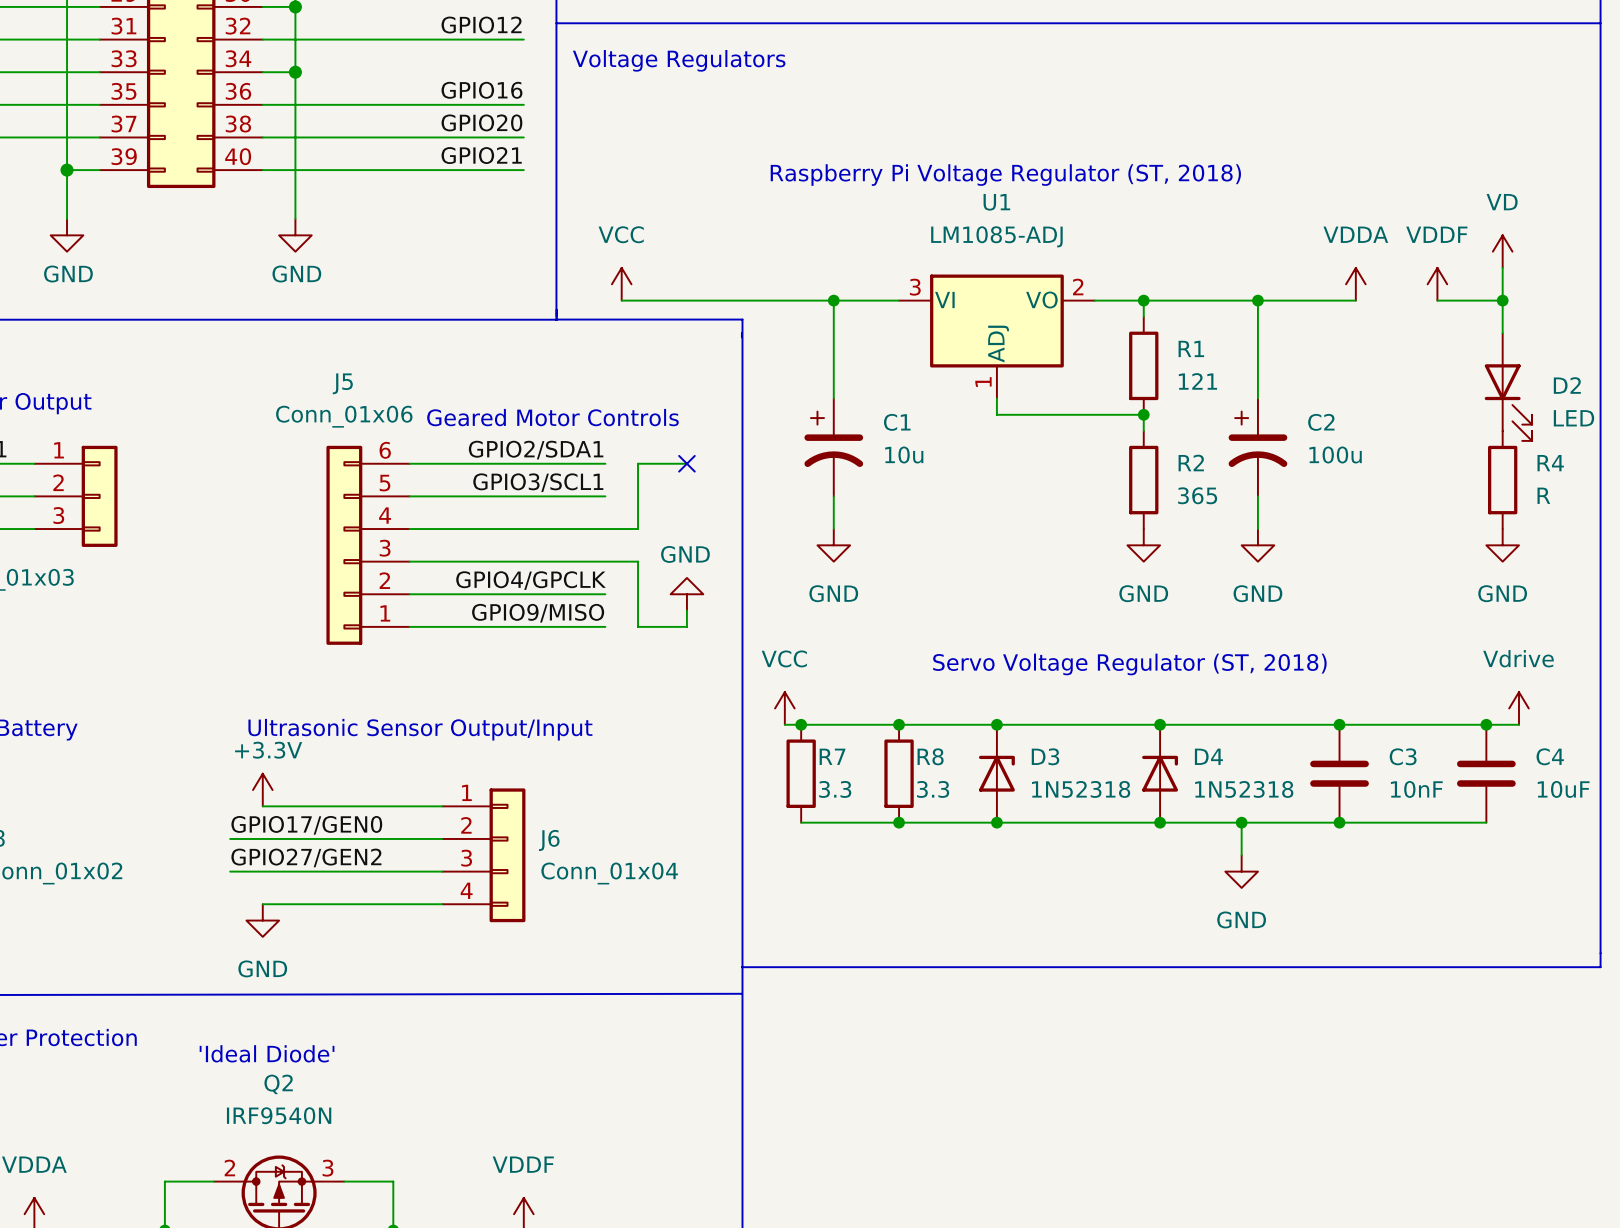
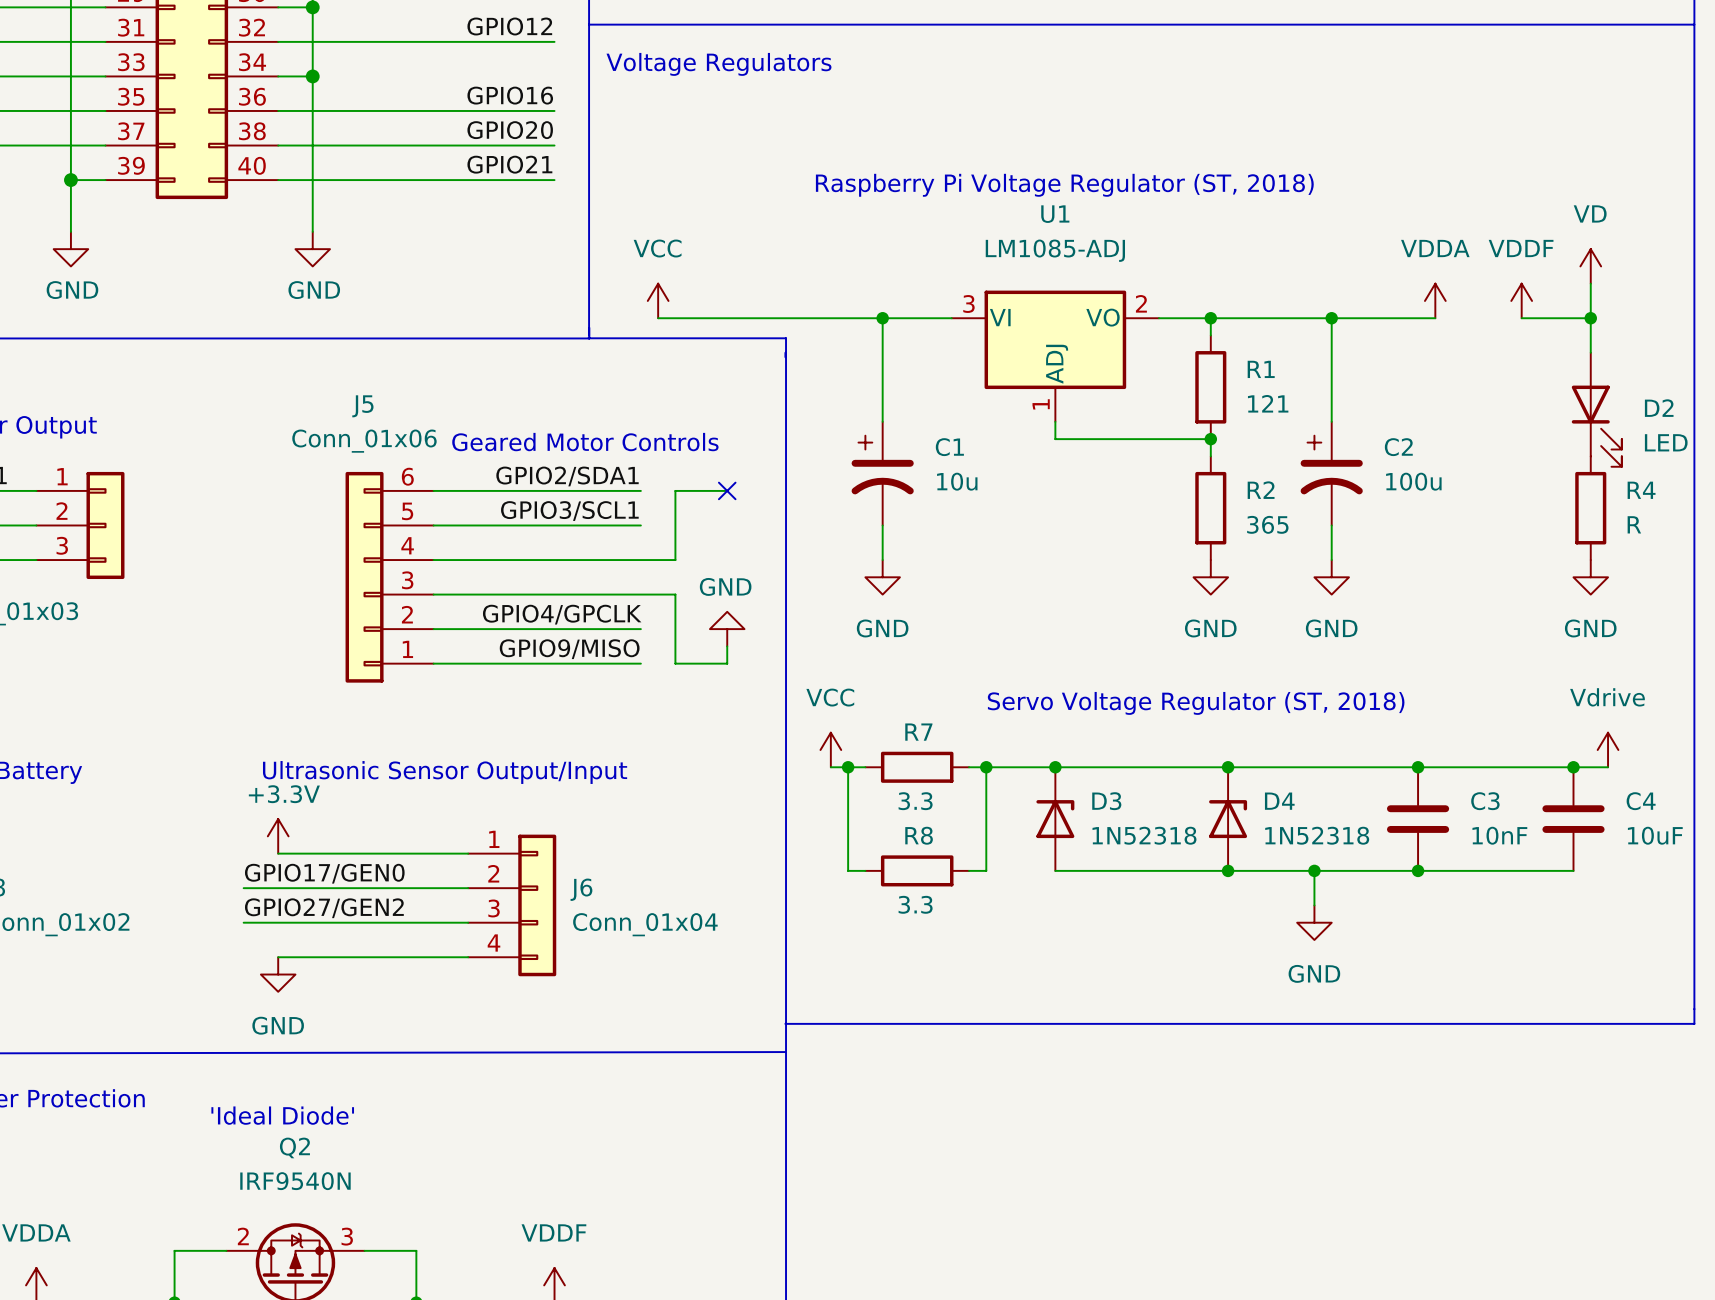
wire: none -> (848, 767) (848, 870)
wire: (817, 724) (915, 724) -> none
junction position: (899, 724) -> (986, 767)
R7 name position: R7 (832, 756) -> R7 (918, 732)
R8 name position: R8 (930, 756) -> R8 (919, 835)
R7 rotation: 0° (801, 773) -> 90° clockwise (917, 767)
R7 position: (801, 773) -> (917, 767)
R8 rotation: 0° (899, 773) -> 90° clockwise (917, 870)
R8 position: (899, 773) -> (917, 870)
wire: (817, 822) (915, 822) -> none
junction: (899, 822) -> none
wire: (931, 822) (996, 822) -> (986, 870) (986, 767)
junction: (996, 822) -> none

